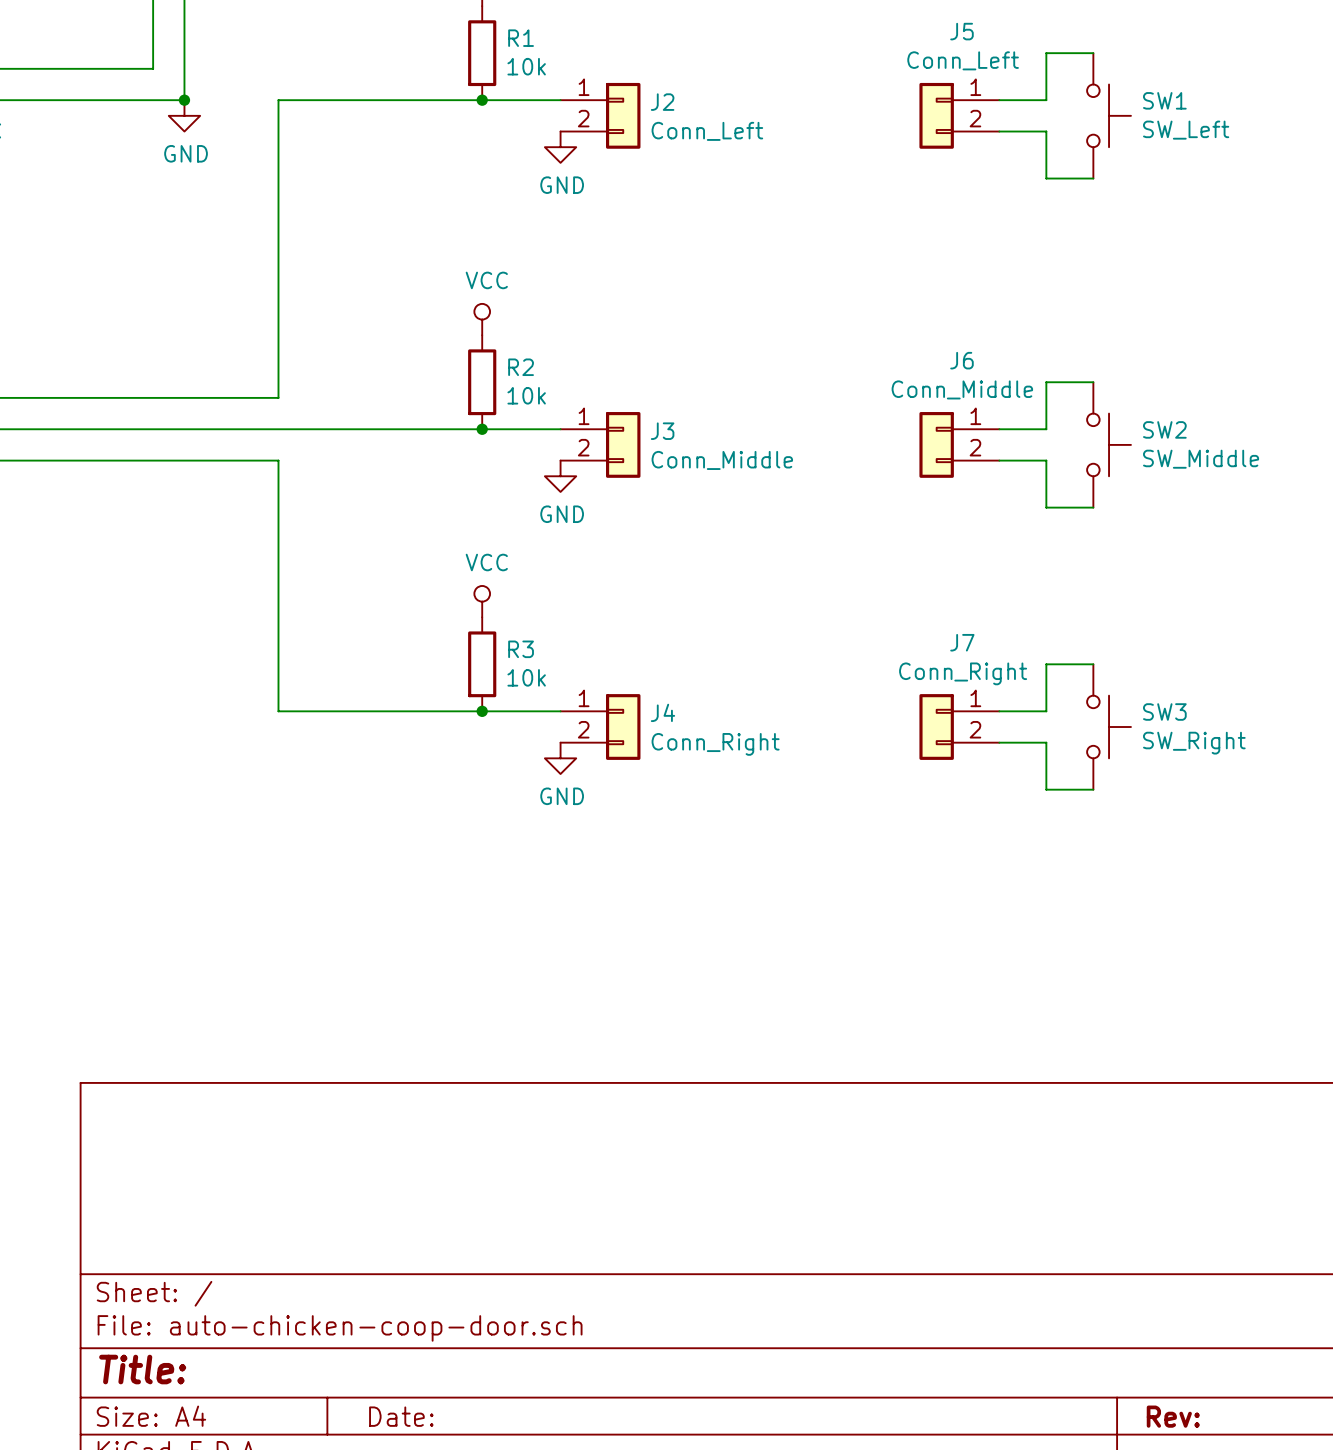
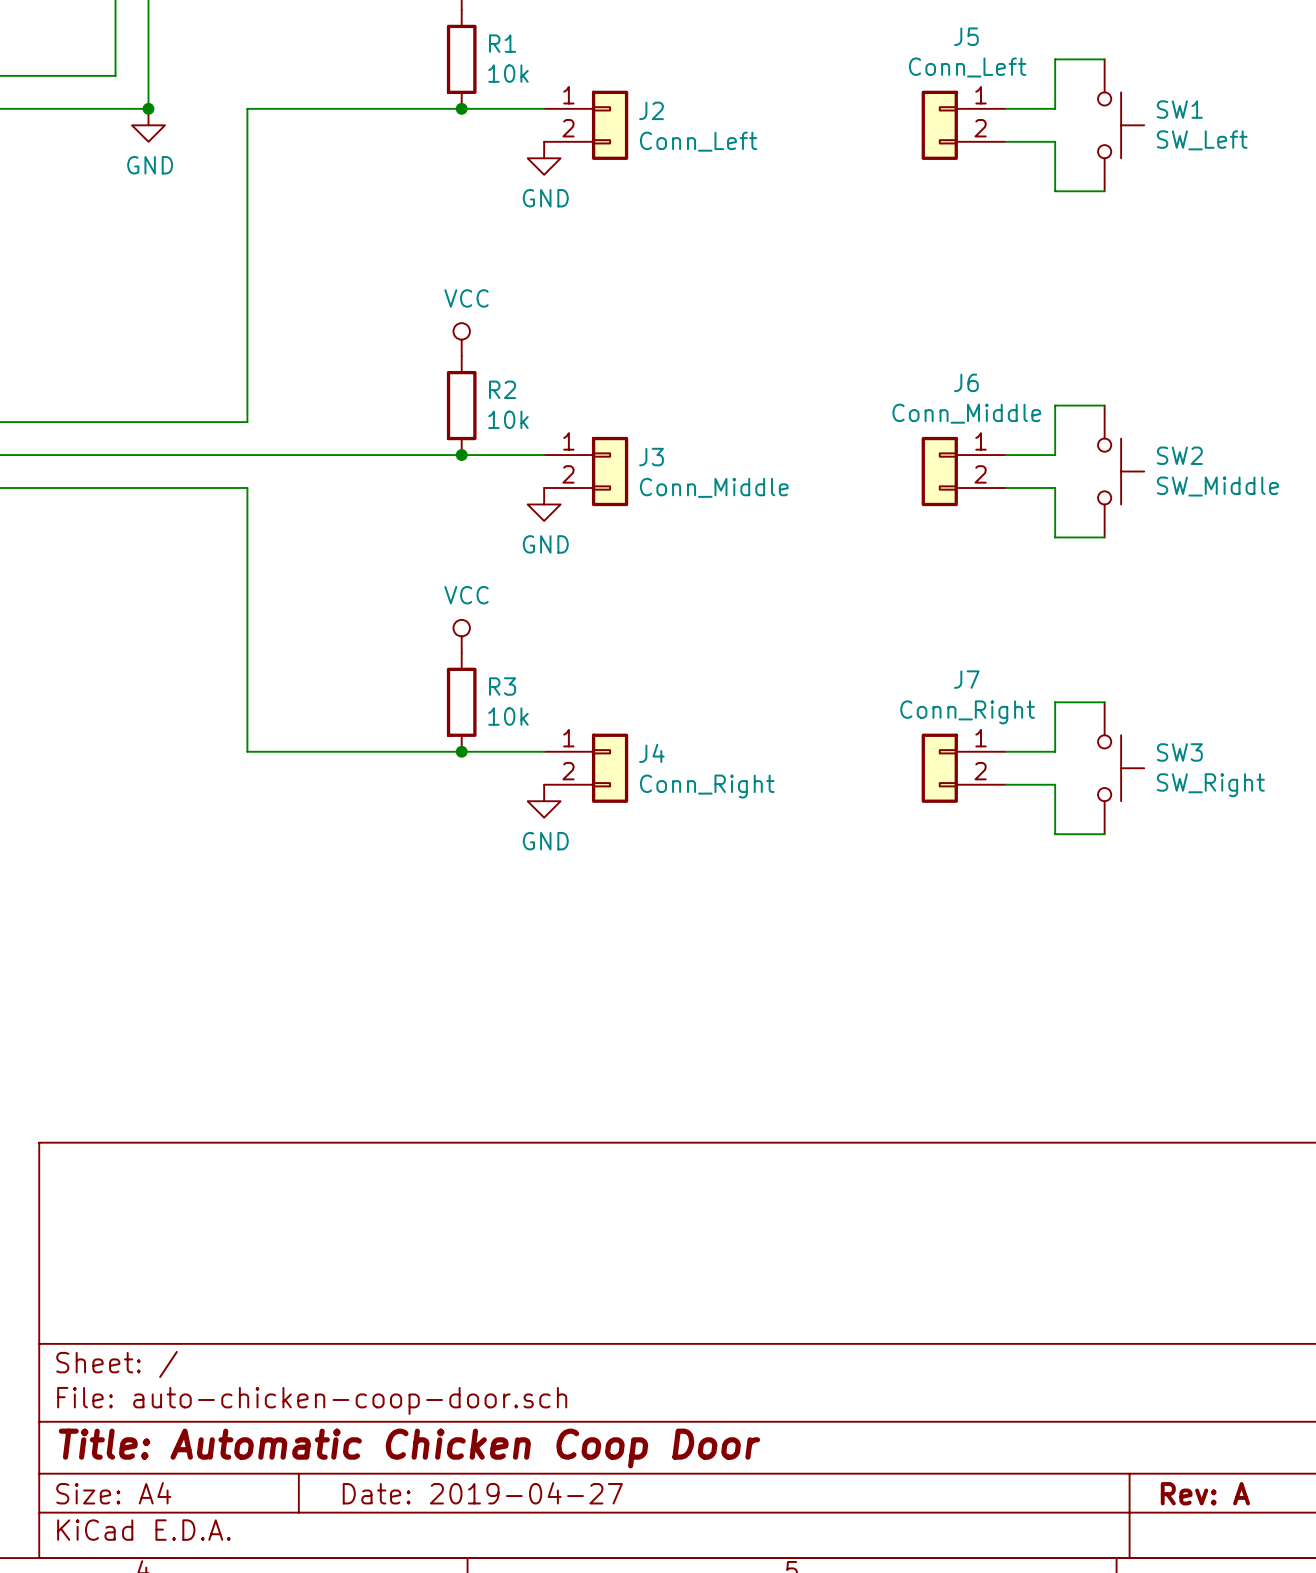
title block: Title: (142, 1369) -> Title: Automatic Chicken Coop Door (409, 1448)
title block: Date: (401, 1416) -> Date: 2019-04-27 (482, 1493)
title block: Rev: (1173, 1416) -> Rev: A (1205, 1493)

